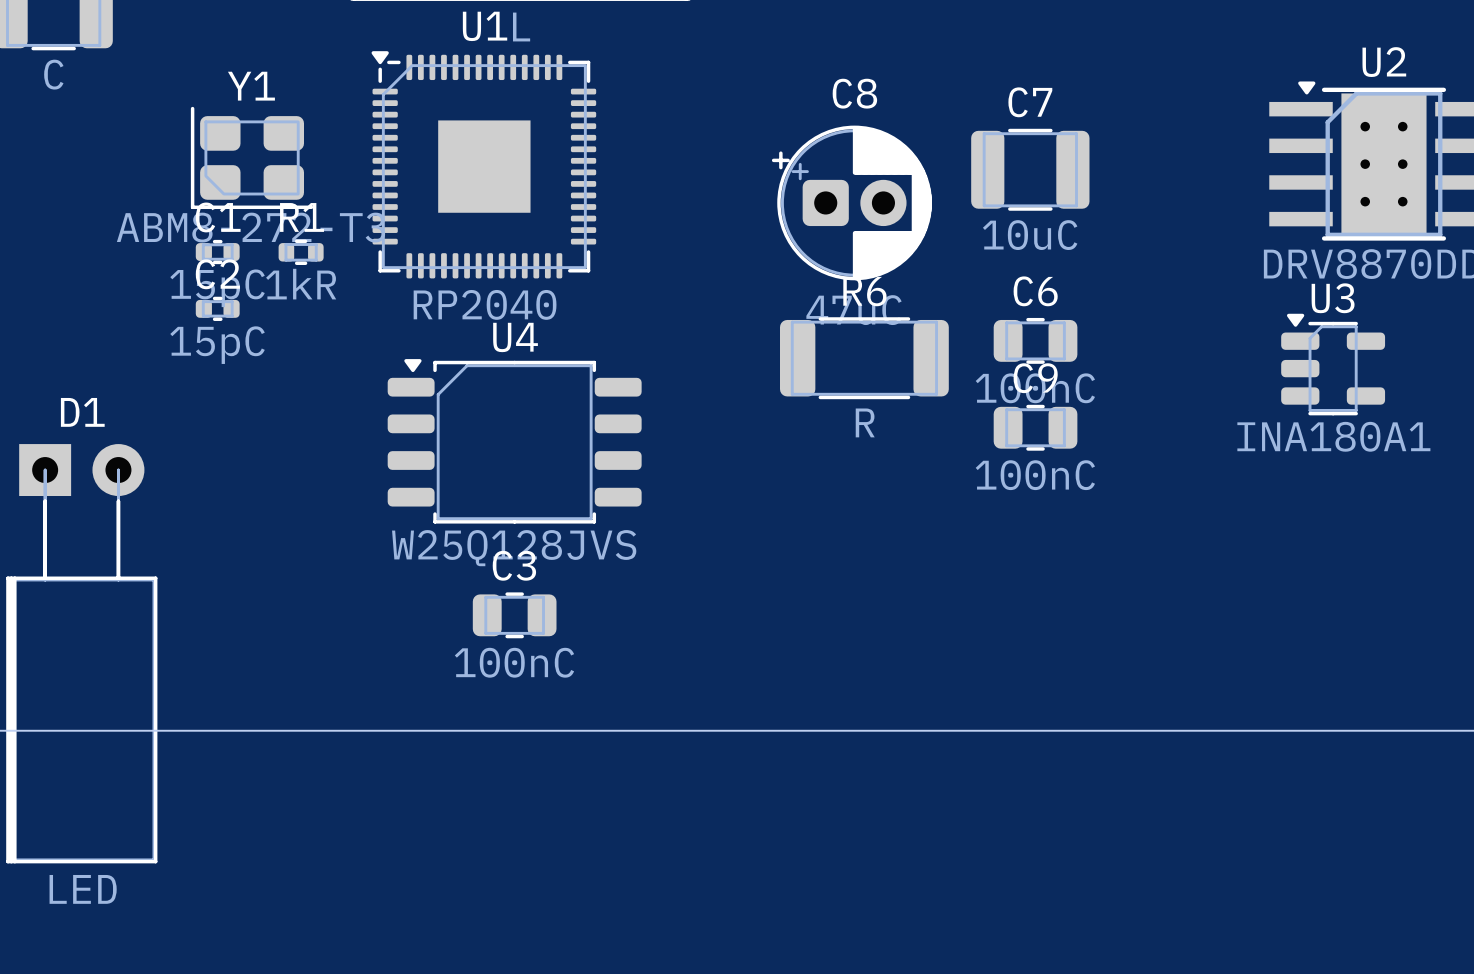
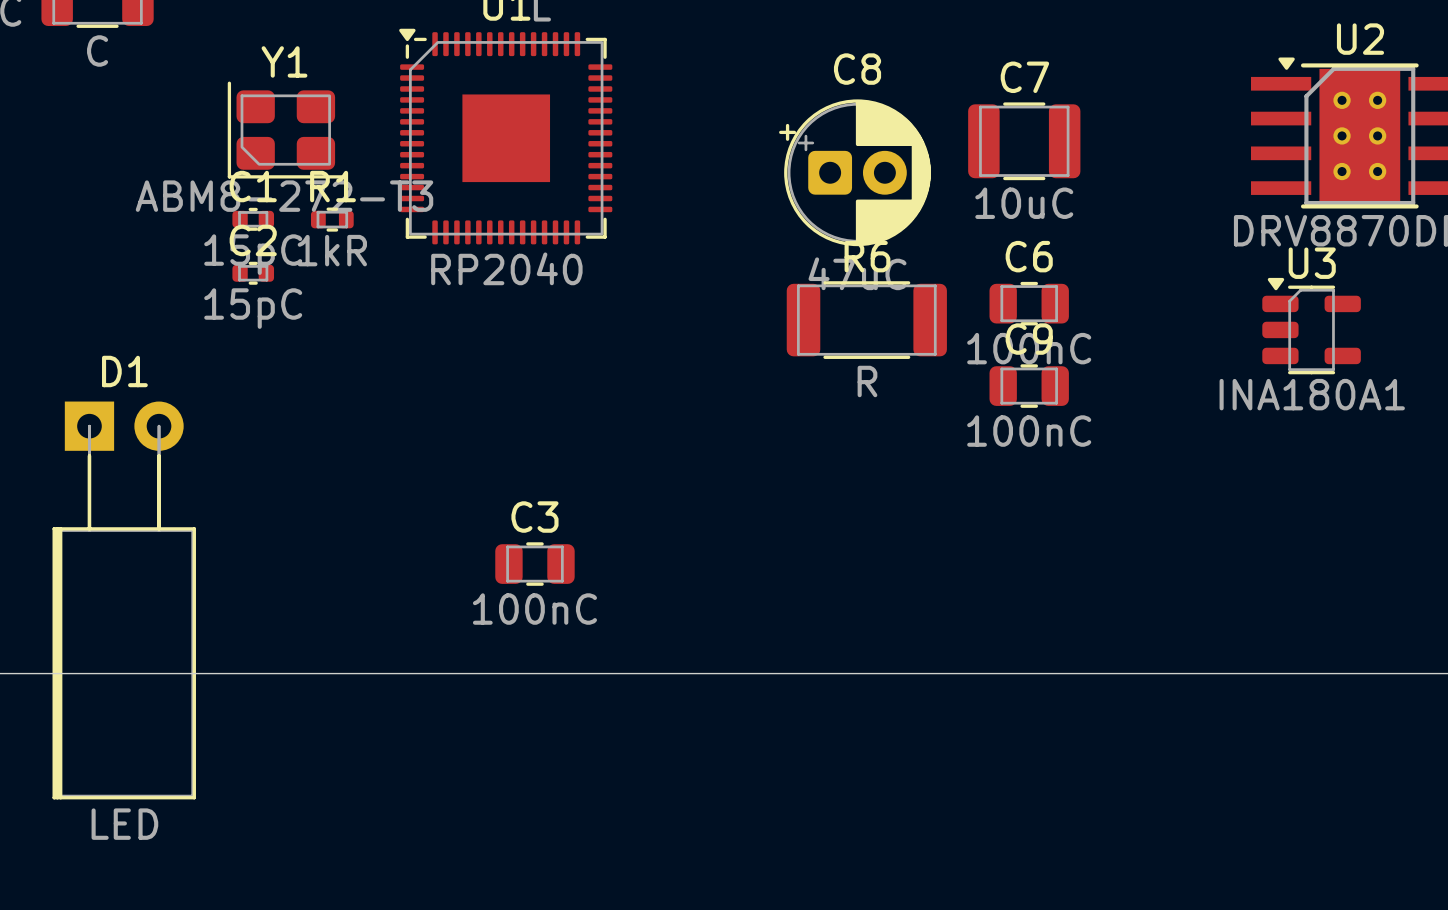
U4: W25Q128JVS (514, 441) -> none

